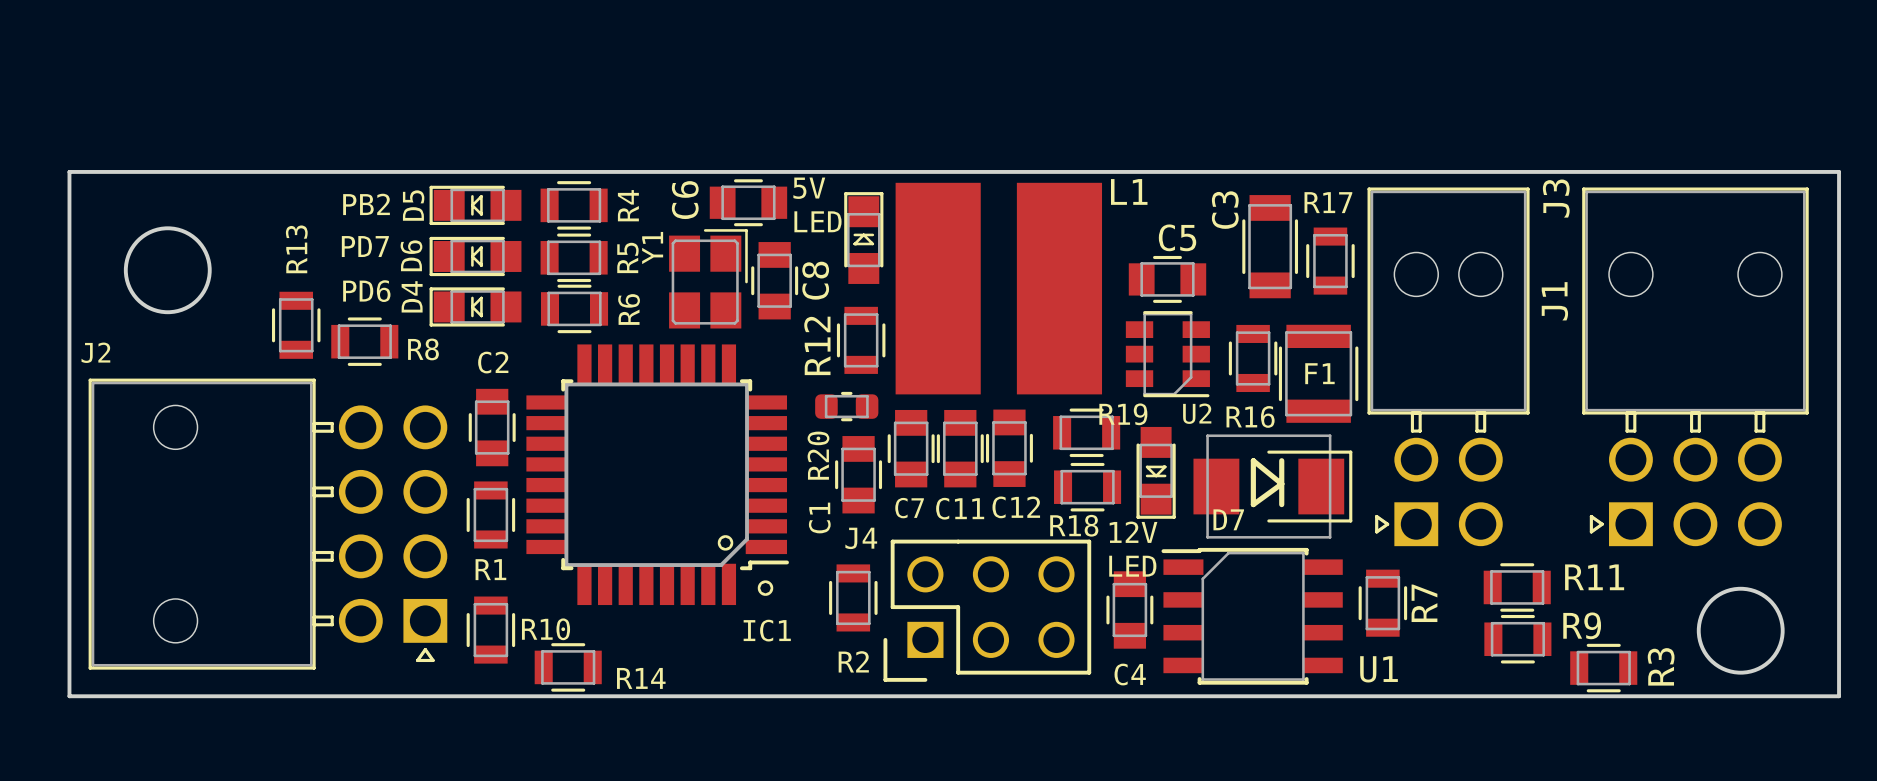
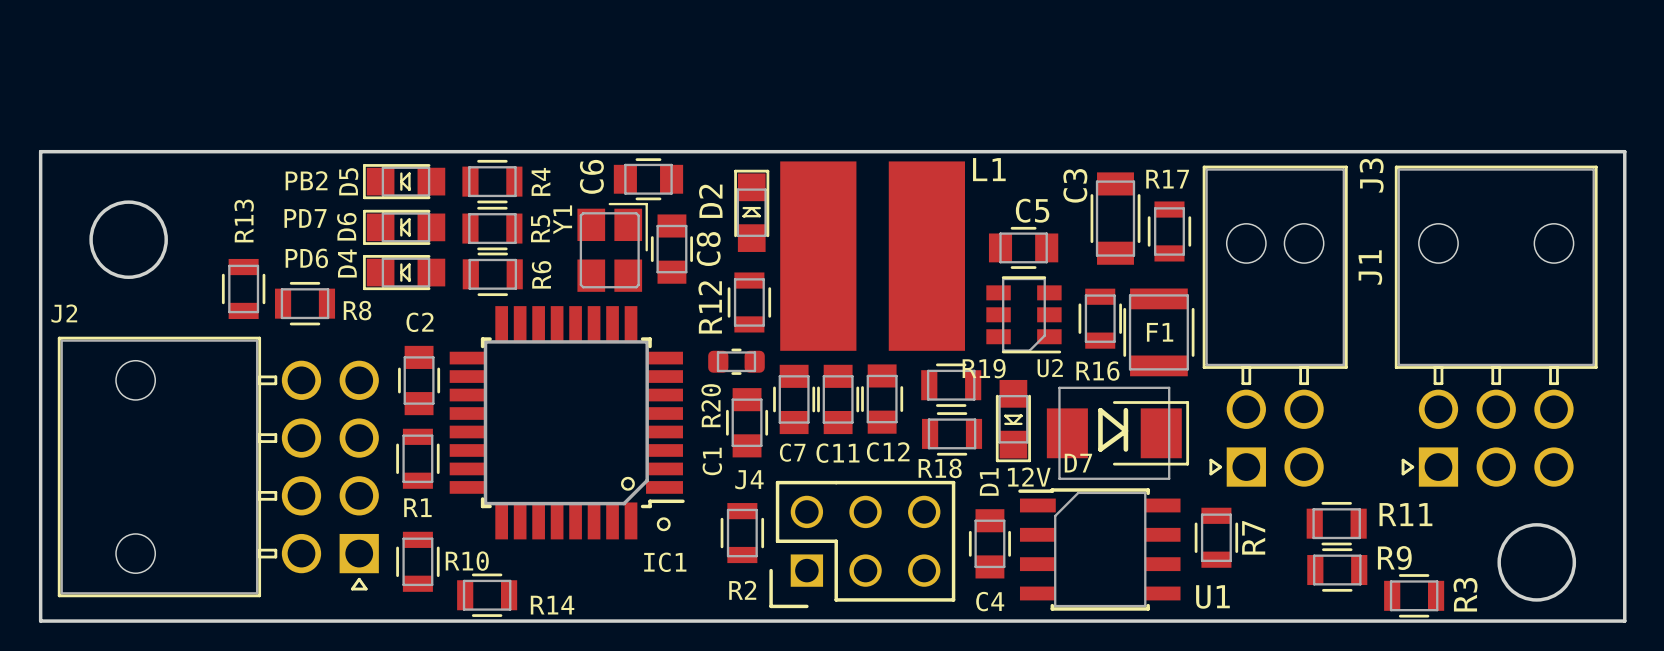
text: 5V (809, 188) -> none
text: LED (817, 221) -> none
D2 name: none -> D2 (710, 201)
text position: 12V (1133, 532) -> 12V (1029, 477)
D1 name: none -> D1 (989, 482)
text: LED (1132, 566) -> none

